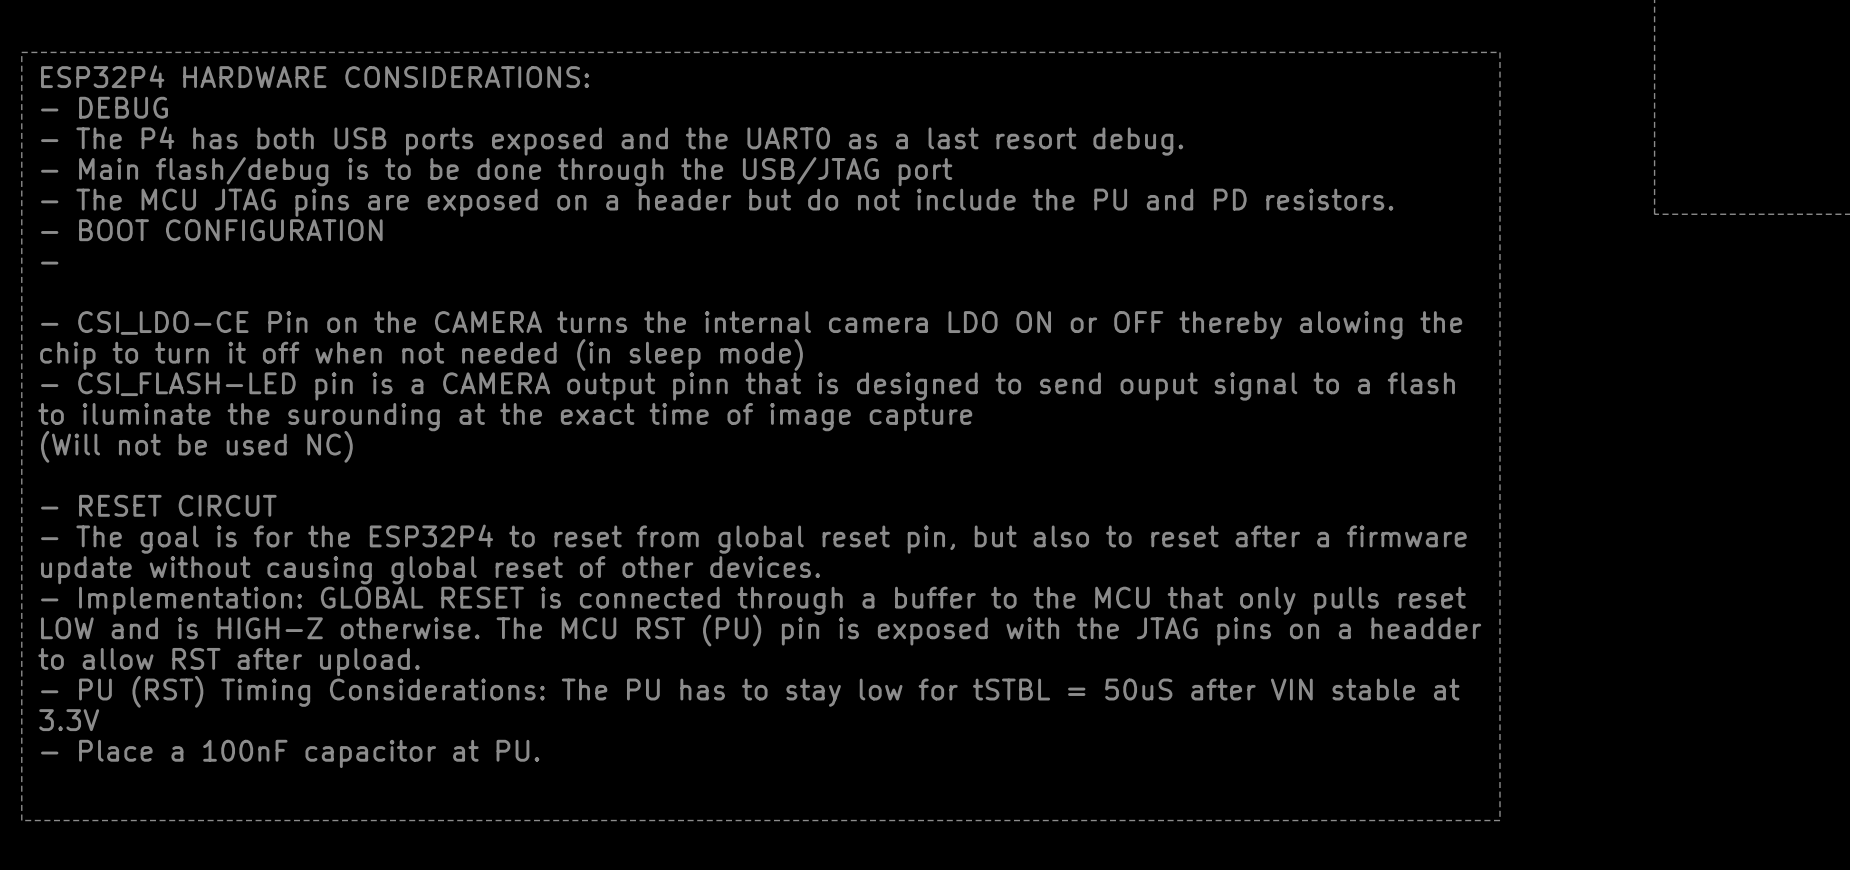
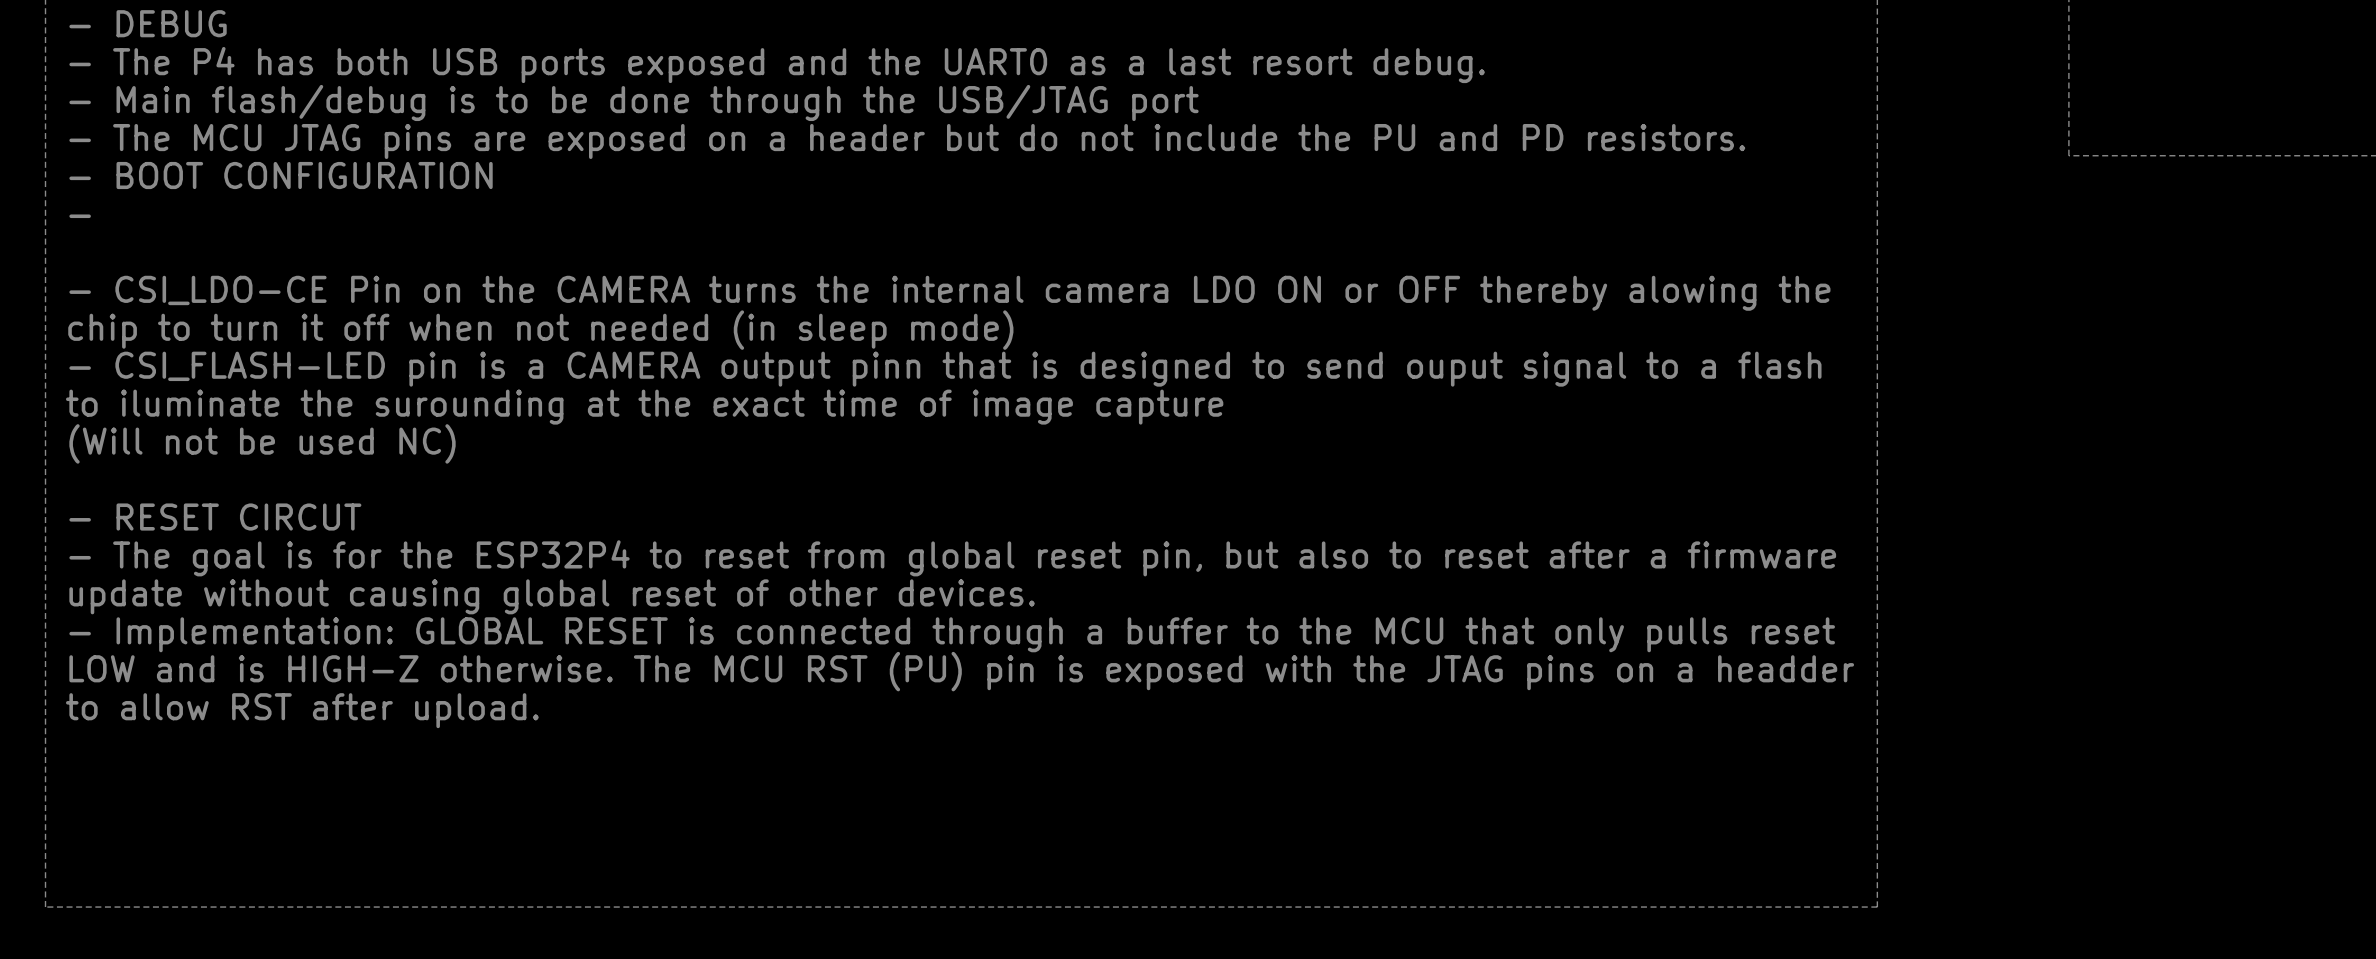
text: - PU (RST) Timing Considerations: The PU has to stay low for tSTBL = 50uS after VIN stable at (750, 691) -> none
text: 3.3V (69, 720) -> none
text: - Place a 100nF capacitor at PU. (290, 753) -> none

